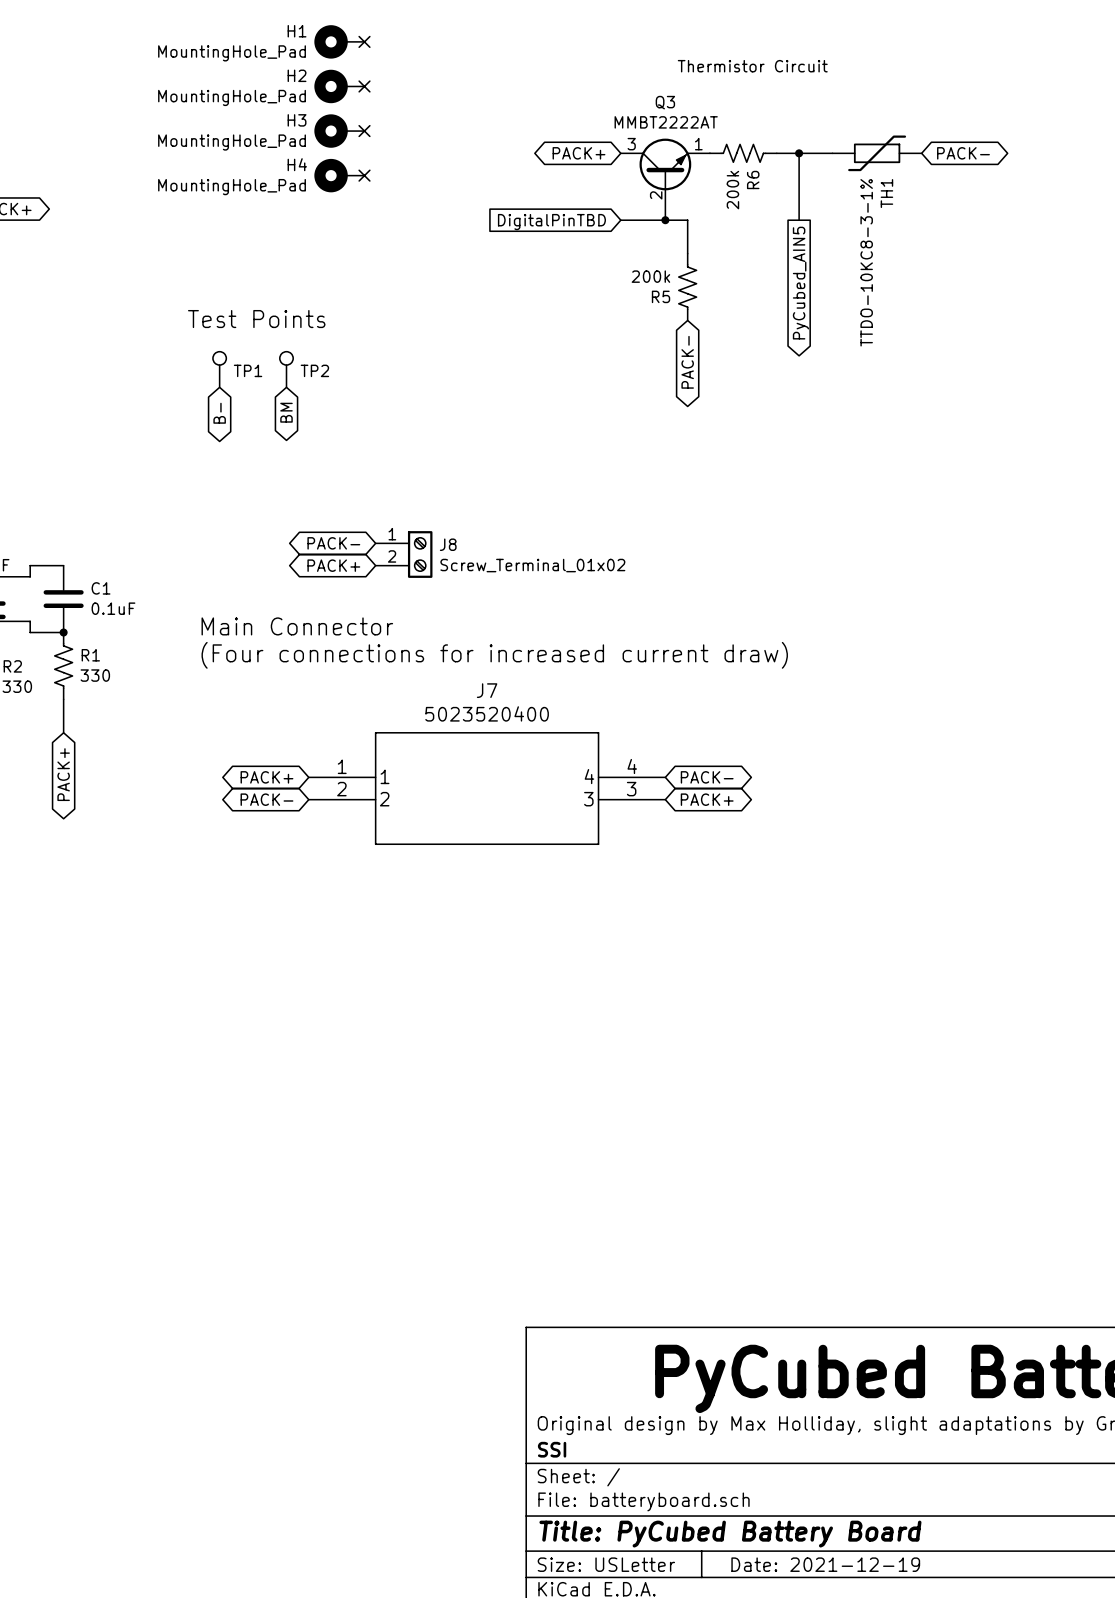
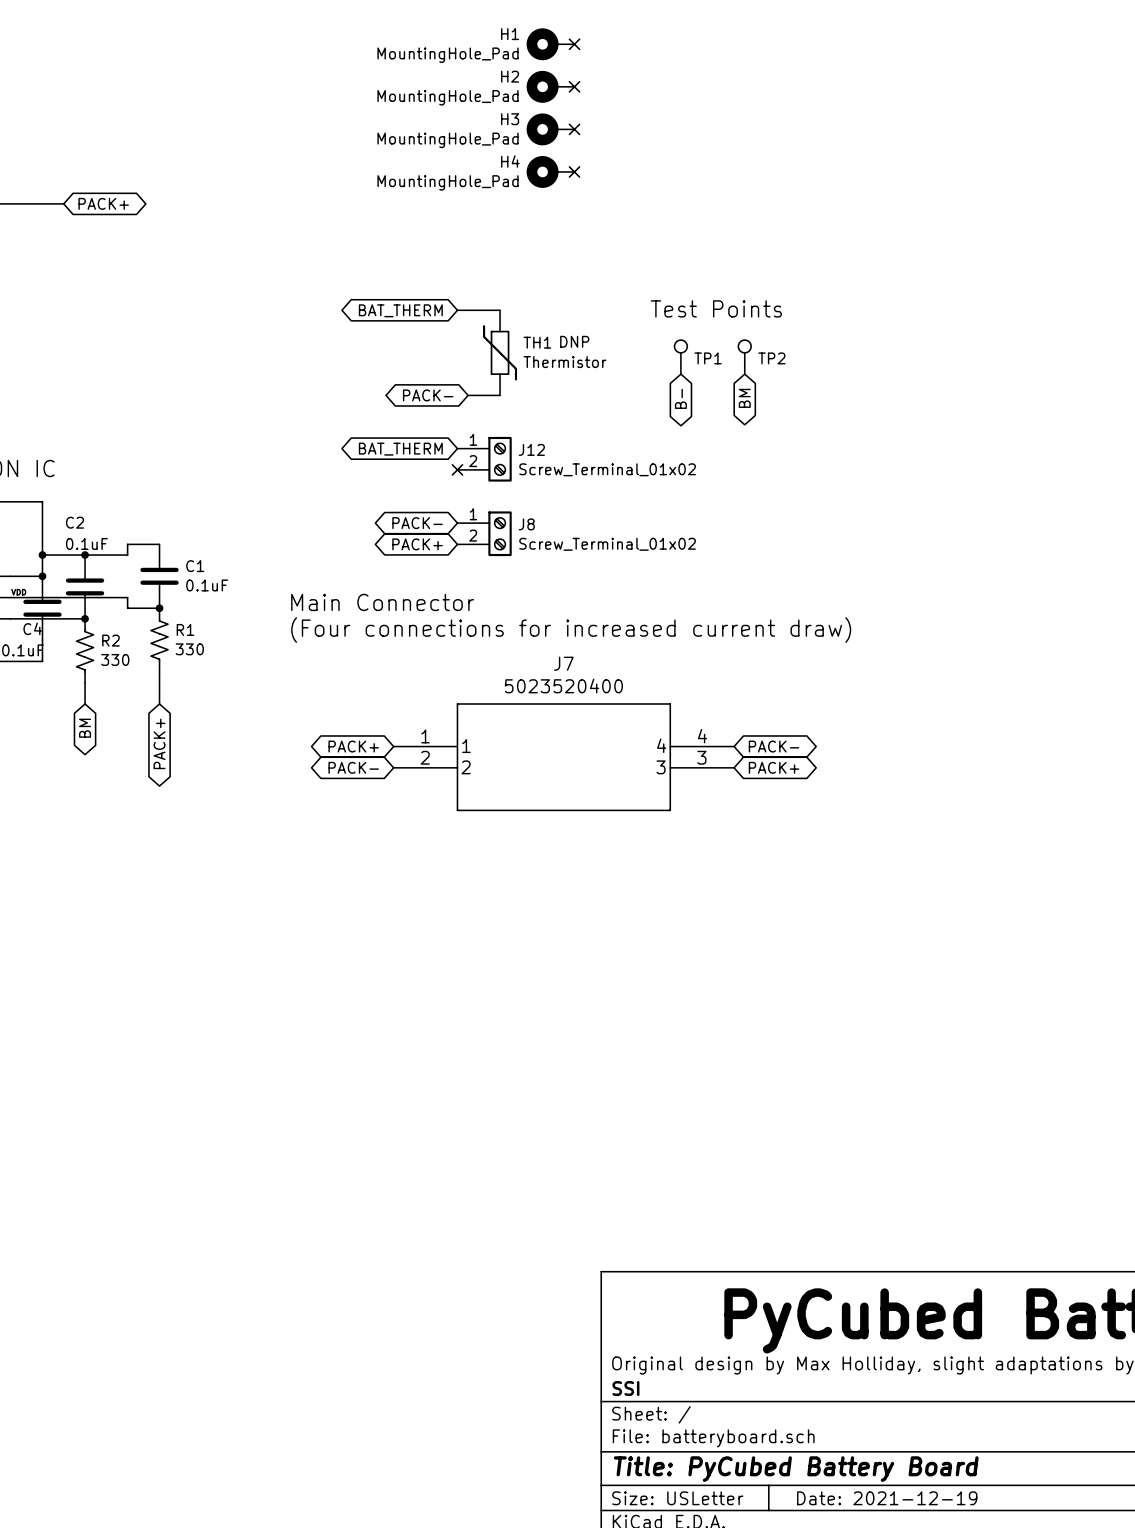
H1 position: (339, 41) -> (550, 44)
no-connect mark: (364, 41) -> none
no-connect mark: none -> (574, 44)
text: Thermistor Circuit (752, 66) -> none
H2 position: (339, 86) -> (550, 86)
no-connect mark: (364, 86) -> none
no-connect mark: none -> (574, 86)
H3 position: (339, 131) -> (550, 129)
no-connect mark: (364, 131) -> none
no-connect mark: none -> (574, 129)
global label: PACK+ (579, 153) -> none
R6: 200k (743, 153) -> none
wire: (776, 153) (832, 153) -> none
wire: (799, 153) (799, 220) -> none
junction: (799, 153) -> none
TH1 rotation: 0° (877, 153) -> 90° counterclockwise (500, 352)
TH1 position: (877, 153) -> (500, 352)
global label: PACK- (963, 153) -> none
H4 position: (339, 175) -> (550, 171)
no-connect mark: (364, 175) -> none
no-connect mark: none -> (574, 171)
Q3: MMBT2222AT (665, 179) -> none
wire: (620, 220) (687, 220) (687, 253) -> none
junction: (665, 220) -> none
global label: DigitalPinTBD (551, 222) -> none
TH1 value: TTDO-10KC8-3-1% (866, 262) -> Thermistor (565, 362)
global label: PyCubed_AIN5 (800, 283) -> none
R5: 200k (687, 287) -> none
text: Test Points (256, 319) -> none
text: none -> Test Points (716, 308)
wire: none -> (457, 310) (500, 310)
global label: none -> BAT_THERM (400, 310)
TH1 text: none -> DNP (574, 341)
global label: PACK- (687, 362) -> none
TP1 position: (219, 369) -> (680, 357)
TP2 position: (286, 369) -> (744, 357)
global label: none -> PACK- (428, 395)
wire: none -> (468, 395) (500, 395)
global label: BM (286, 412) -> none
global label: none -> BM (744, 398)
global label: B- (219, 413) -> none
global label: none -> B- (680, 398)
global label: none -> BAT_THERM (400, 449)
J12: none -> Screw_Terminal_01x02 (484, 459)
no-connect mark: none -> (457, 469)

